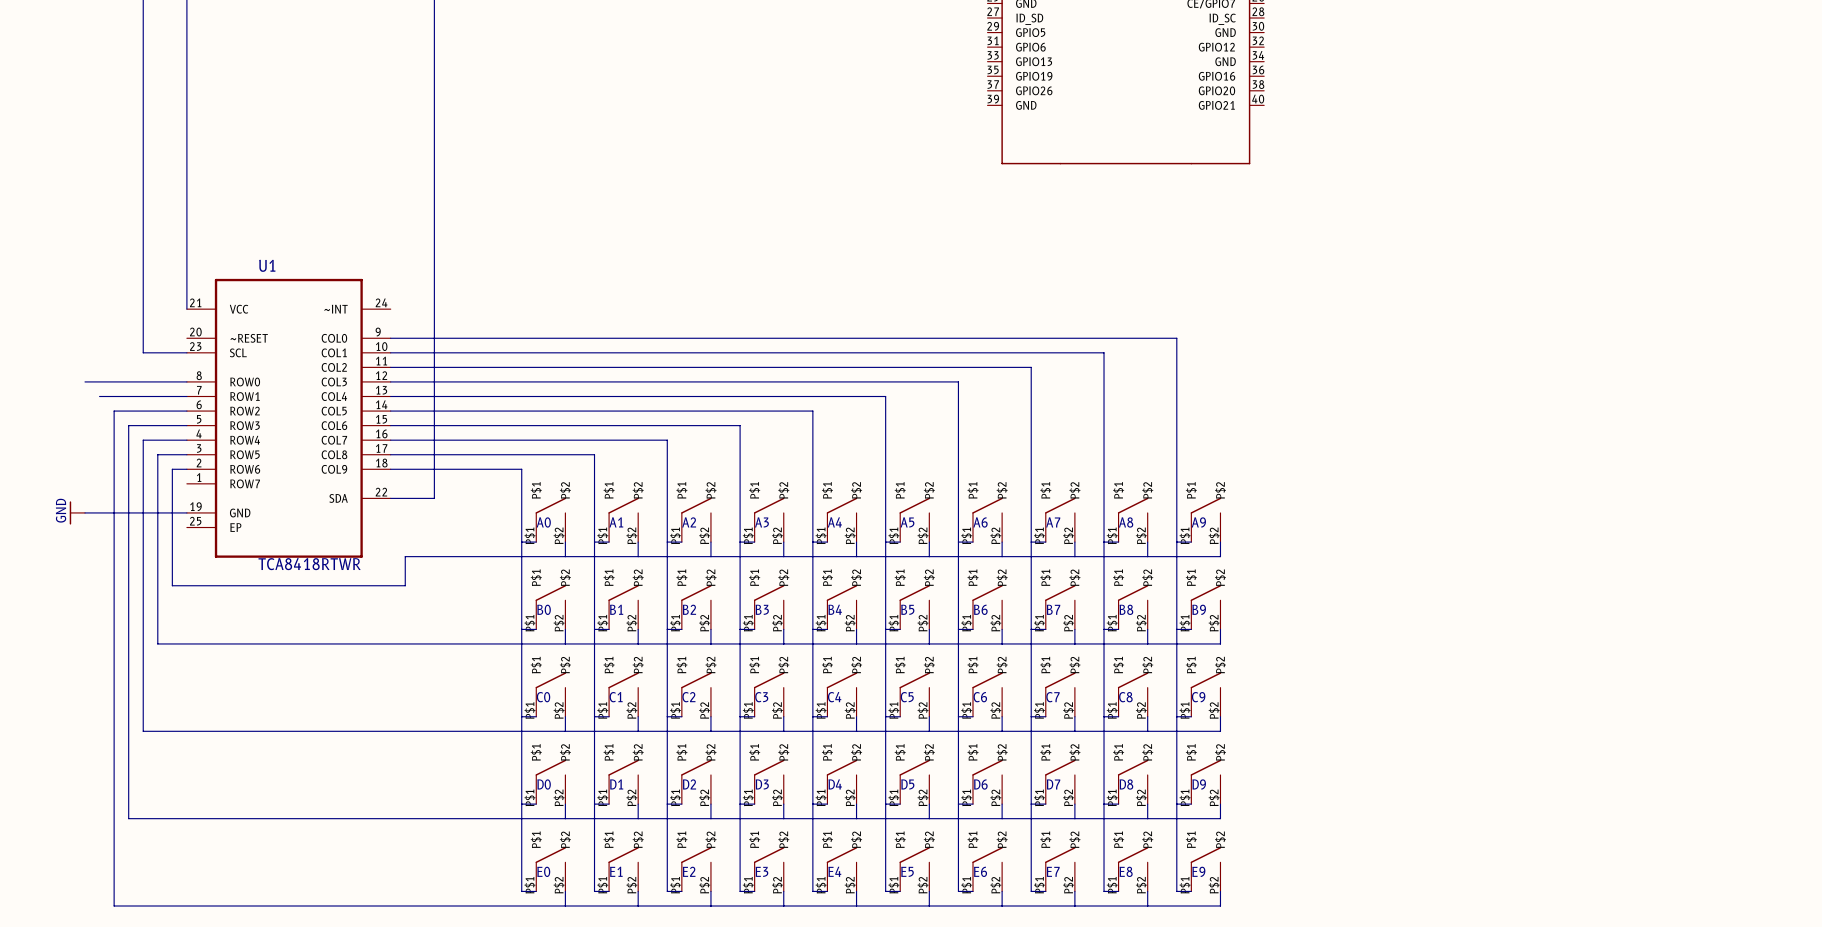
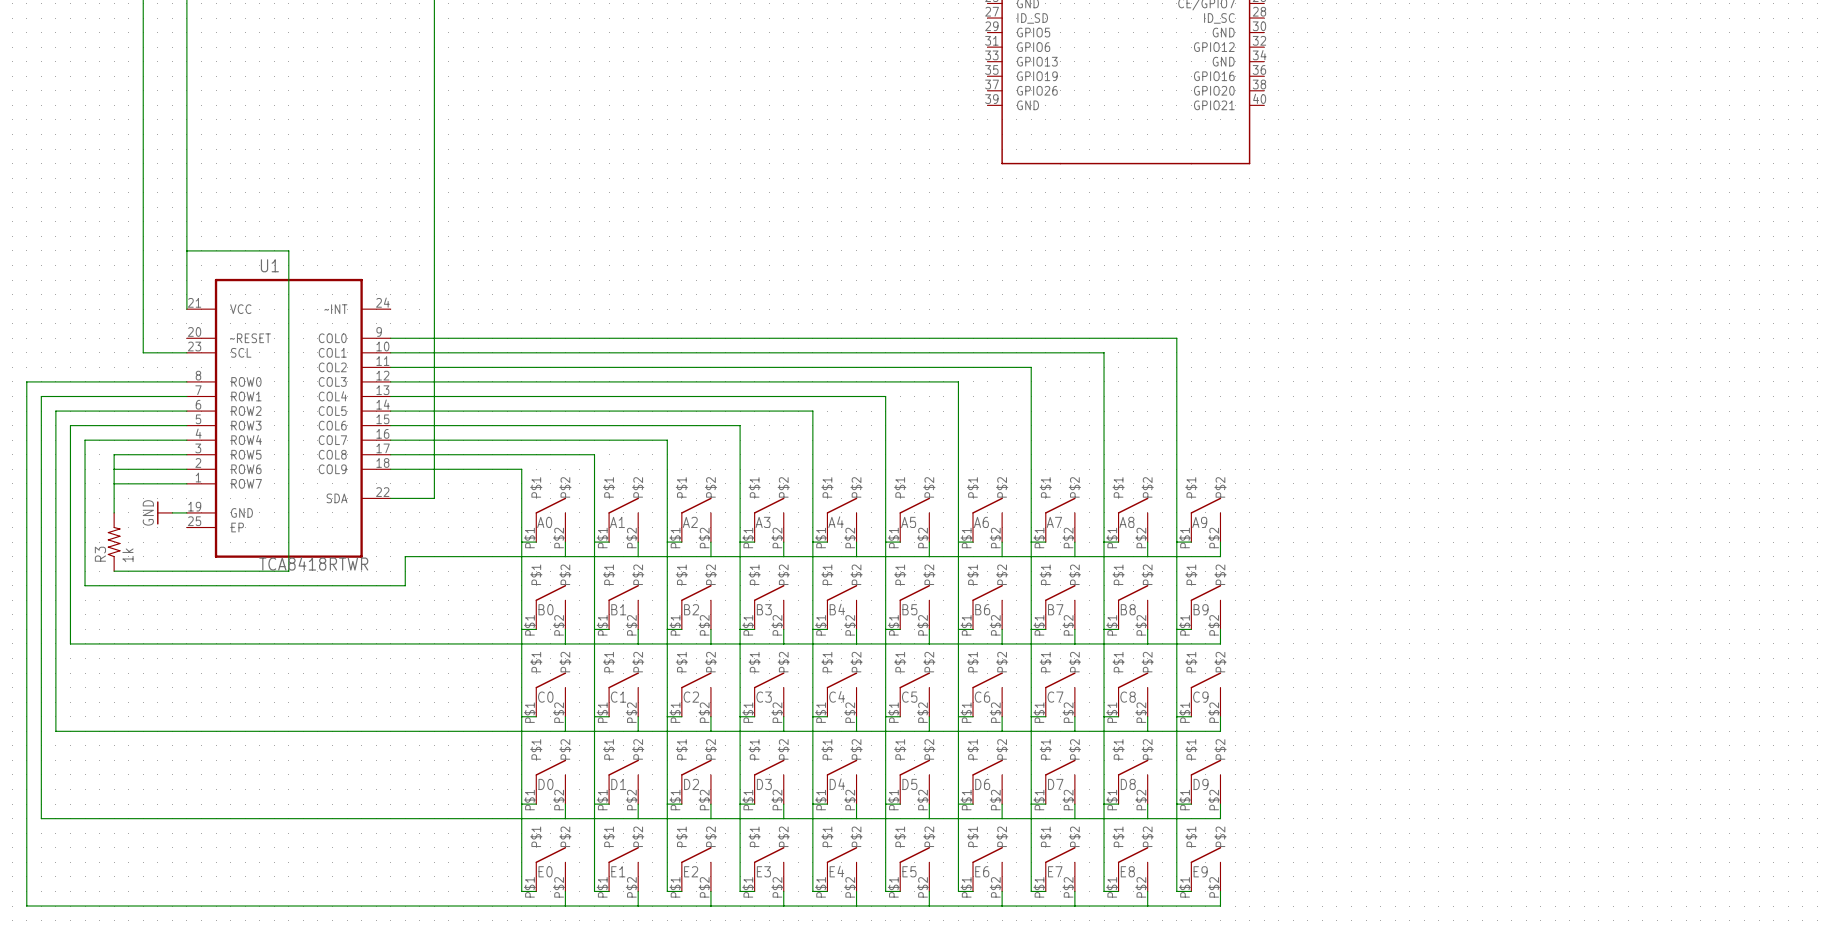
wire: none -> (186, 250) (288, 250) (288, 571) (114, 571)
wire: (114, 411) (114, 454) -> (157, 454) (114, 454)
wire: (128, 425) (128, 818) -> (99, 396) (41, 396) (41, 818) (128, 818)
wire: (143, 440) (143, 731) -> (114, 411) (55, 411) (55, 731) (143, 731)
wire: (157, 454) (157, 643) -> (128, 425) (70, 425) (70, 643) (157, 643)
wire: none -> (114, 469) (172, 469)
wire: (172, 469) (172, 585) -> (143, 440) (85, 440) (85, 585) (172, 585)
wire: none -> (114, 483) (186, 483)
power symbol position: GND (77, 512) -> GND (164, 512)
wire: (85, 512) (172, 512) -> none
wire: (114, 512) (114, 906) -> (85, 381) (26, 381) (26, 906) (114, 906)
R3: none -> 1k (114, 542)

